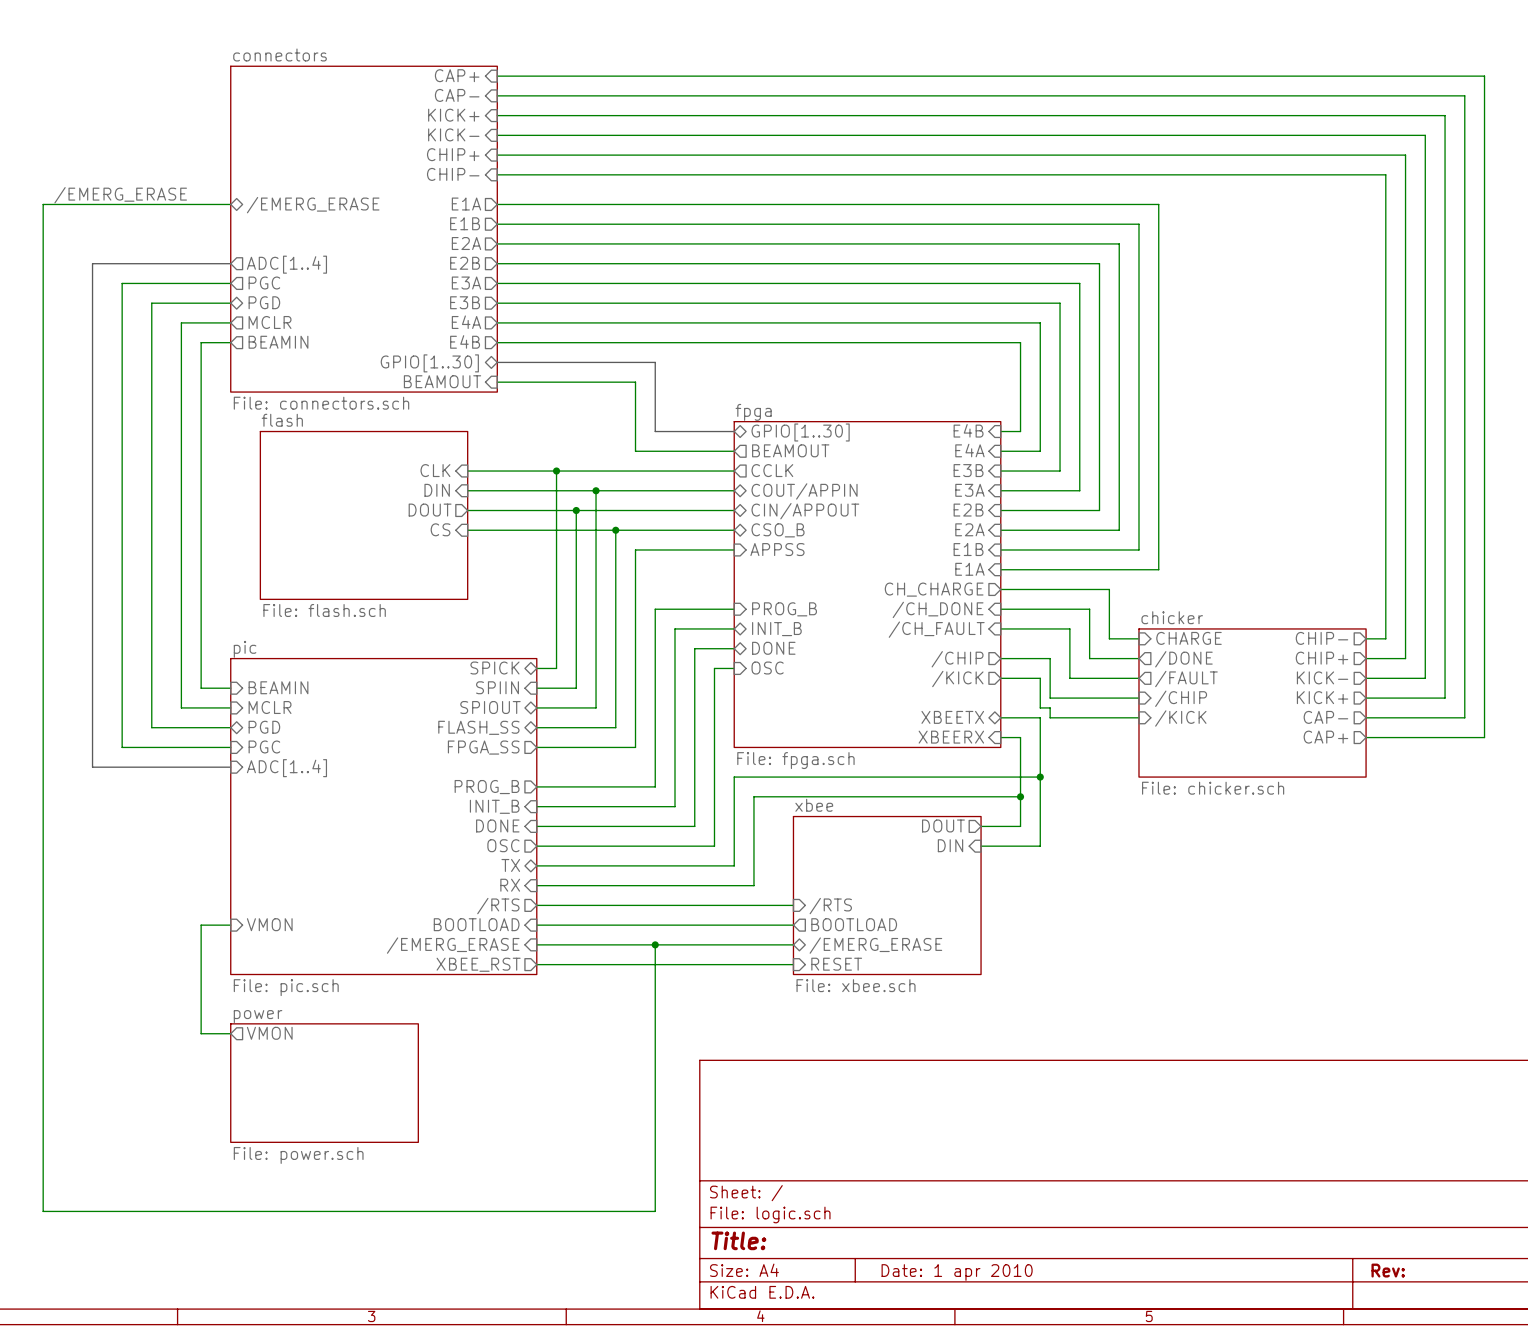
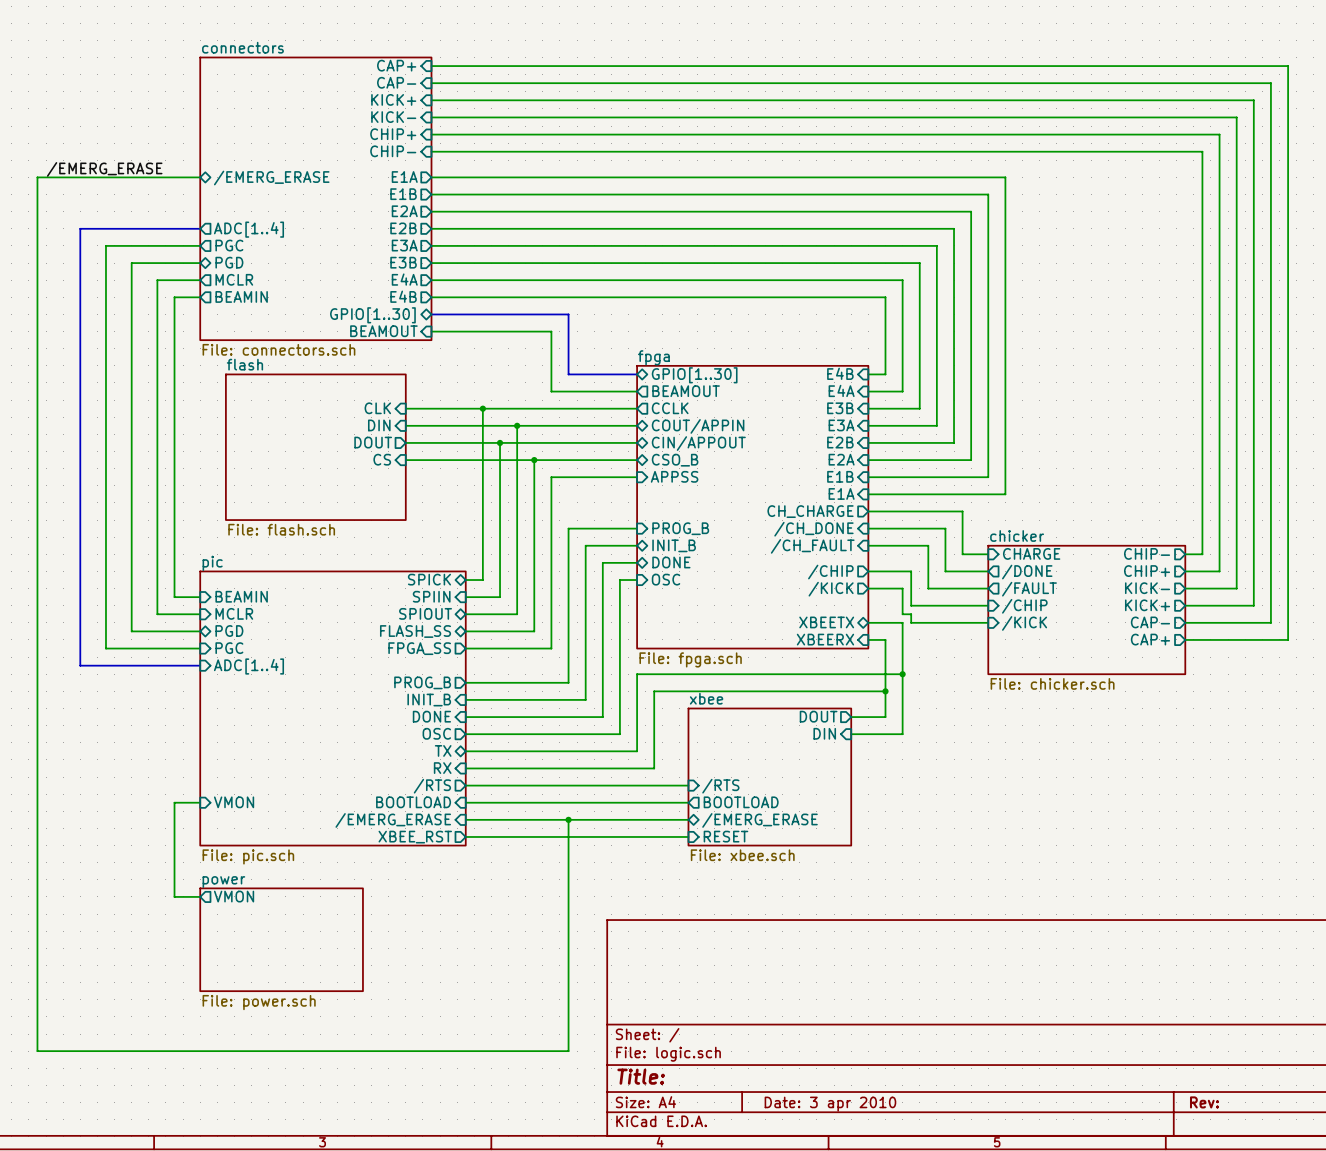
title block: Date: 1 apr 2010 (957, 1272) -> Date: 3 apr 2010 (830, 1104)

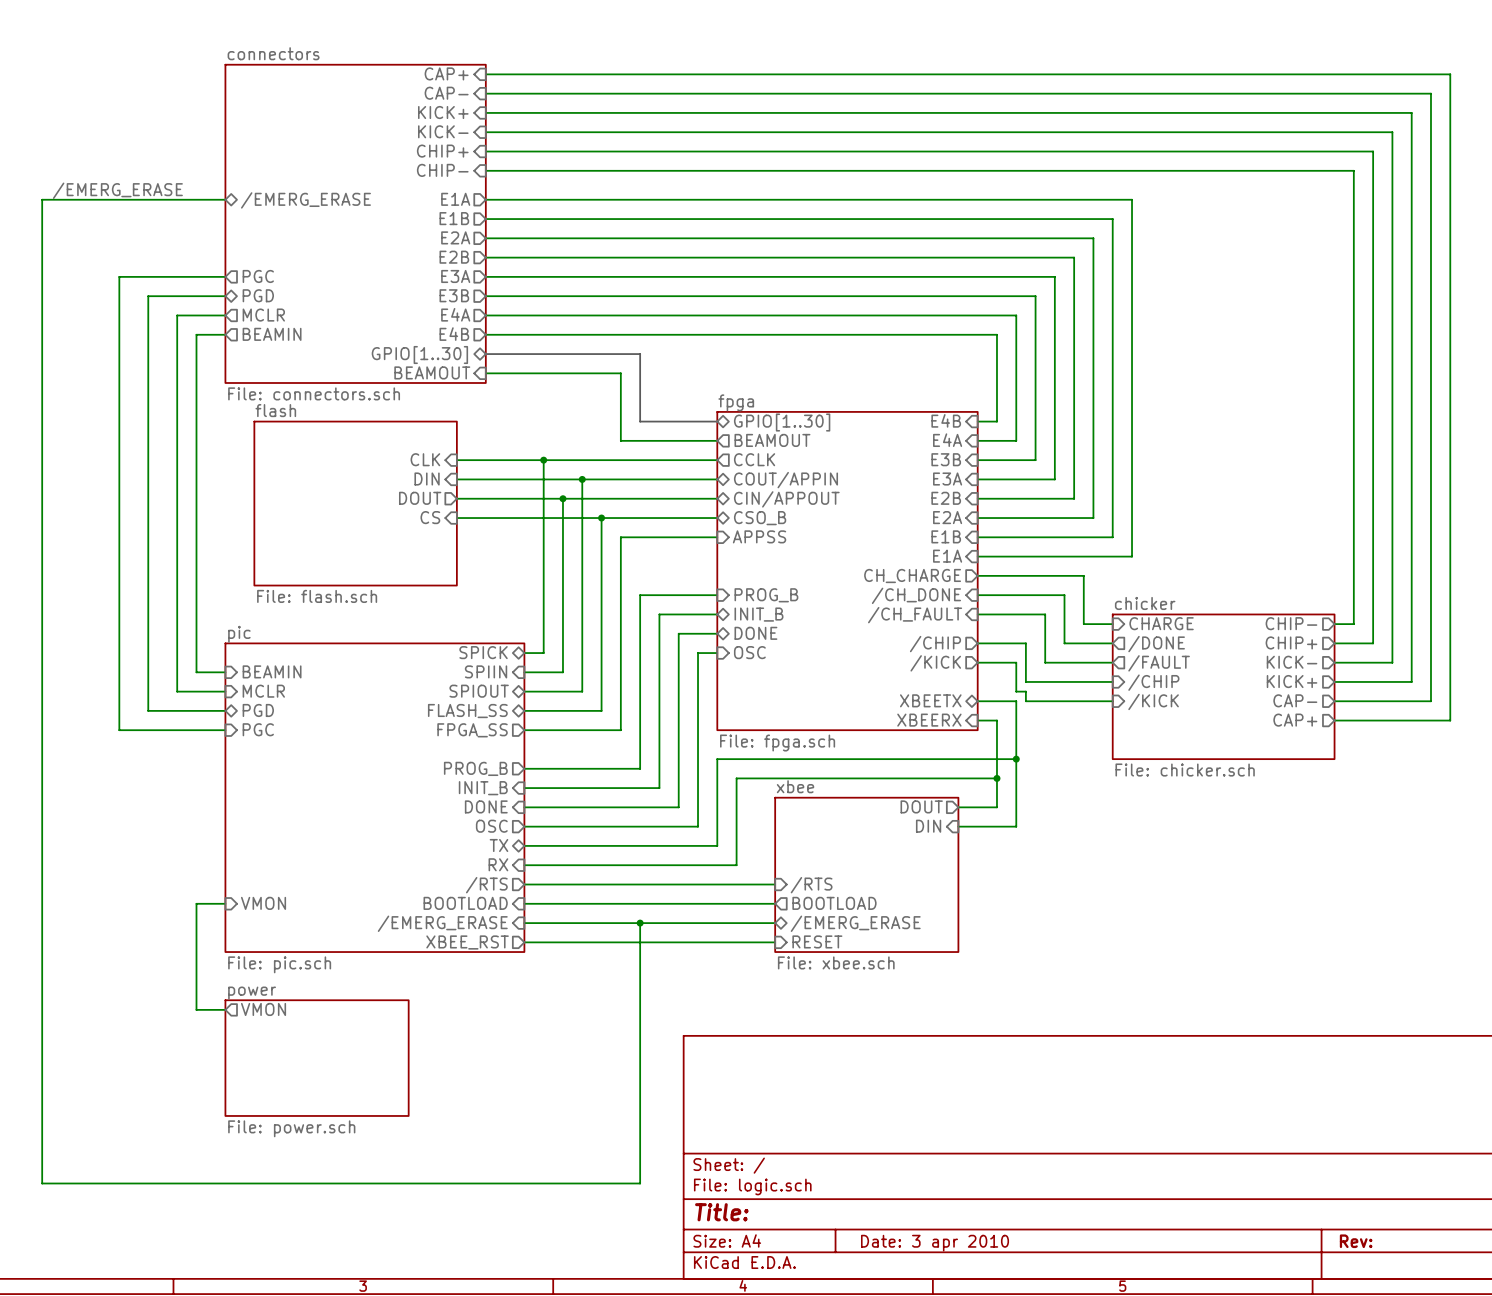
bus: (200, 228) (80, 228) (80, 665) (200, 665) -> none
sheet pin: ADC[1..4] (248, 229) -> none
sheet pin: ADC[1..4] (248, 666) -> none

